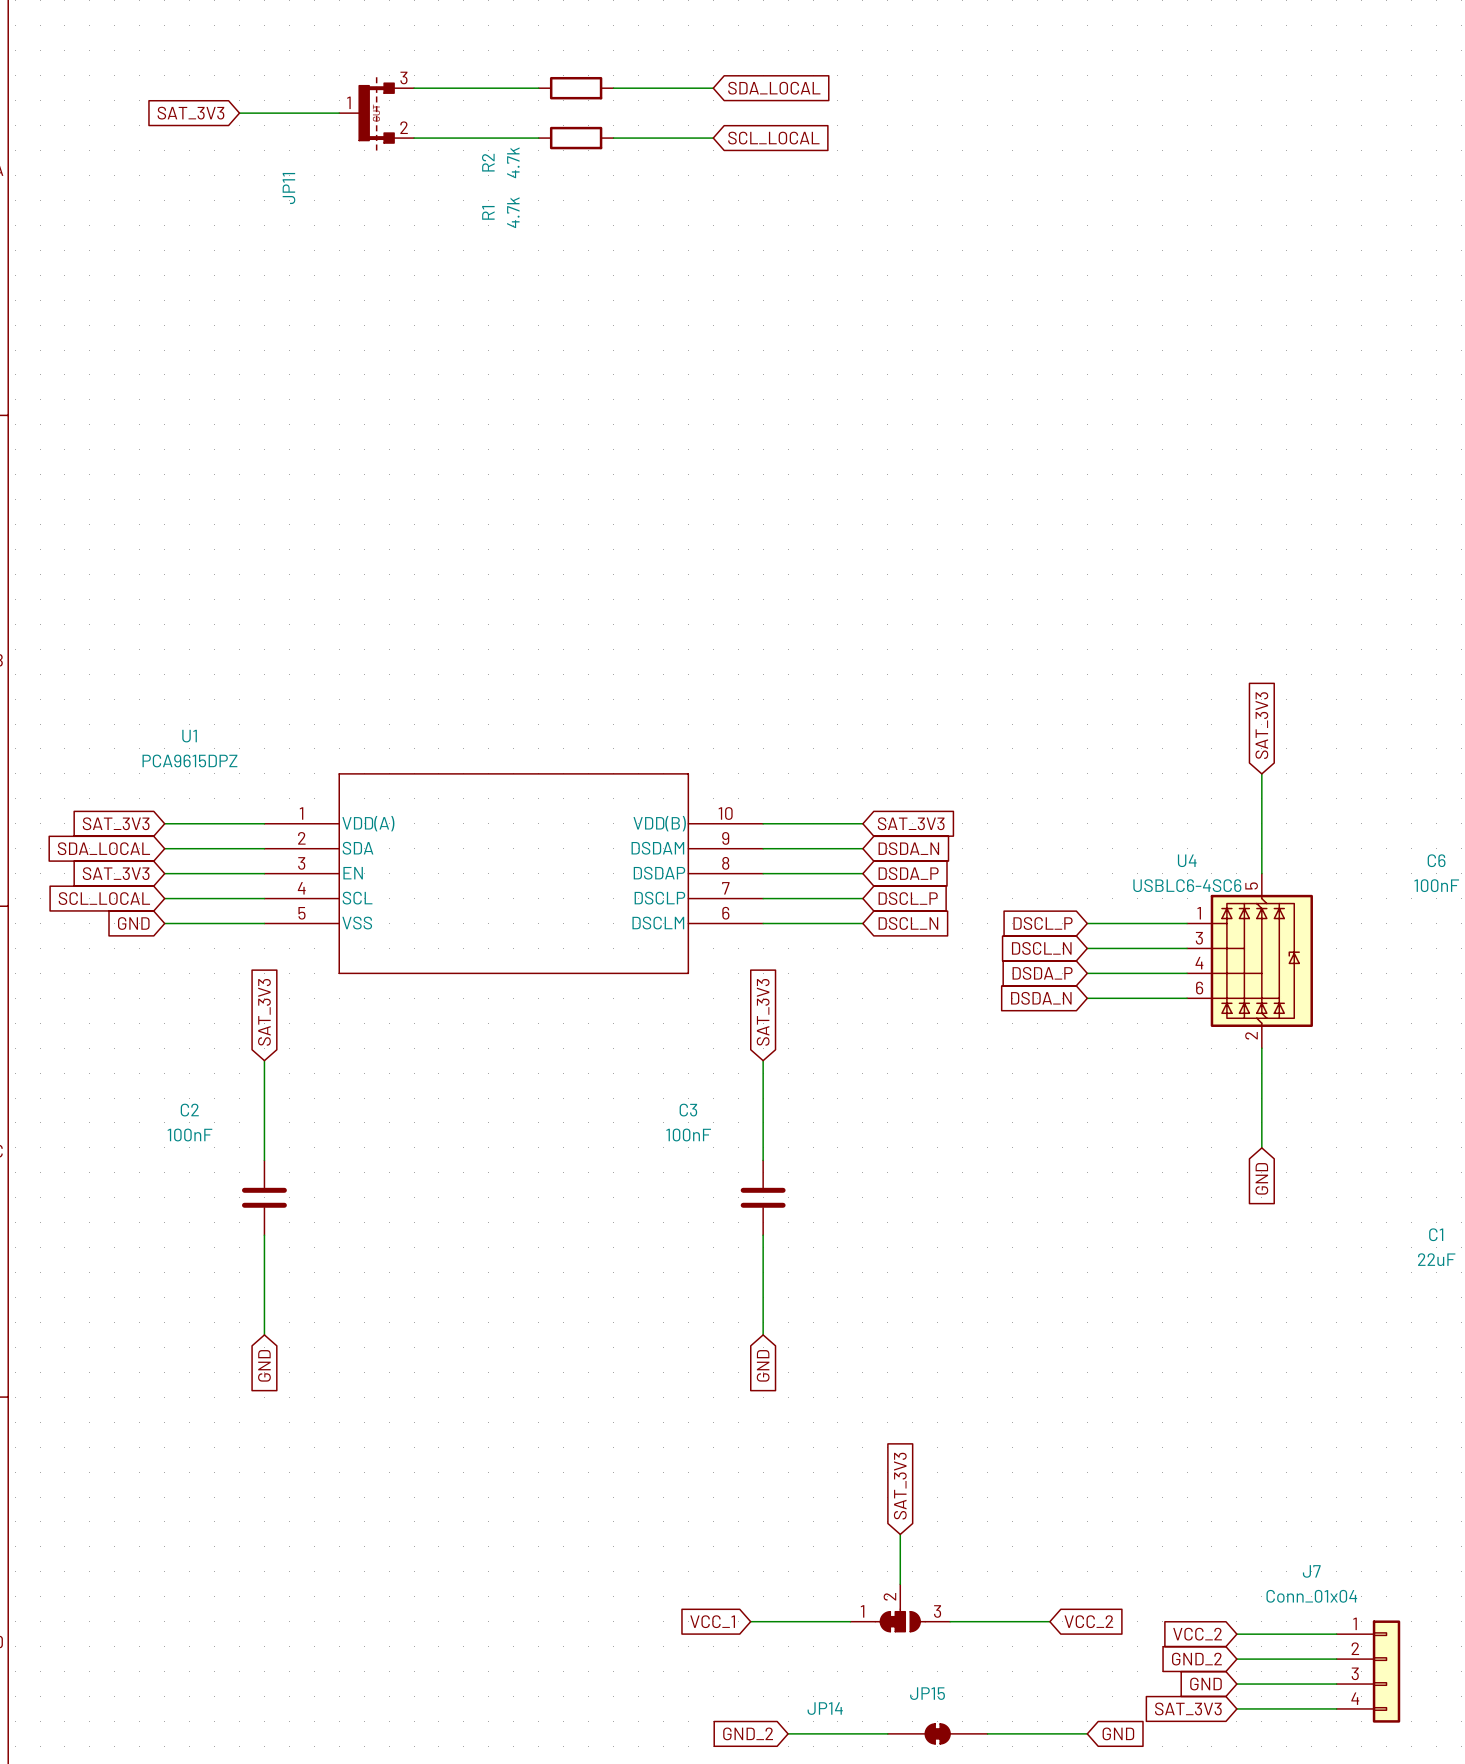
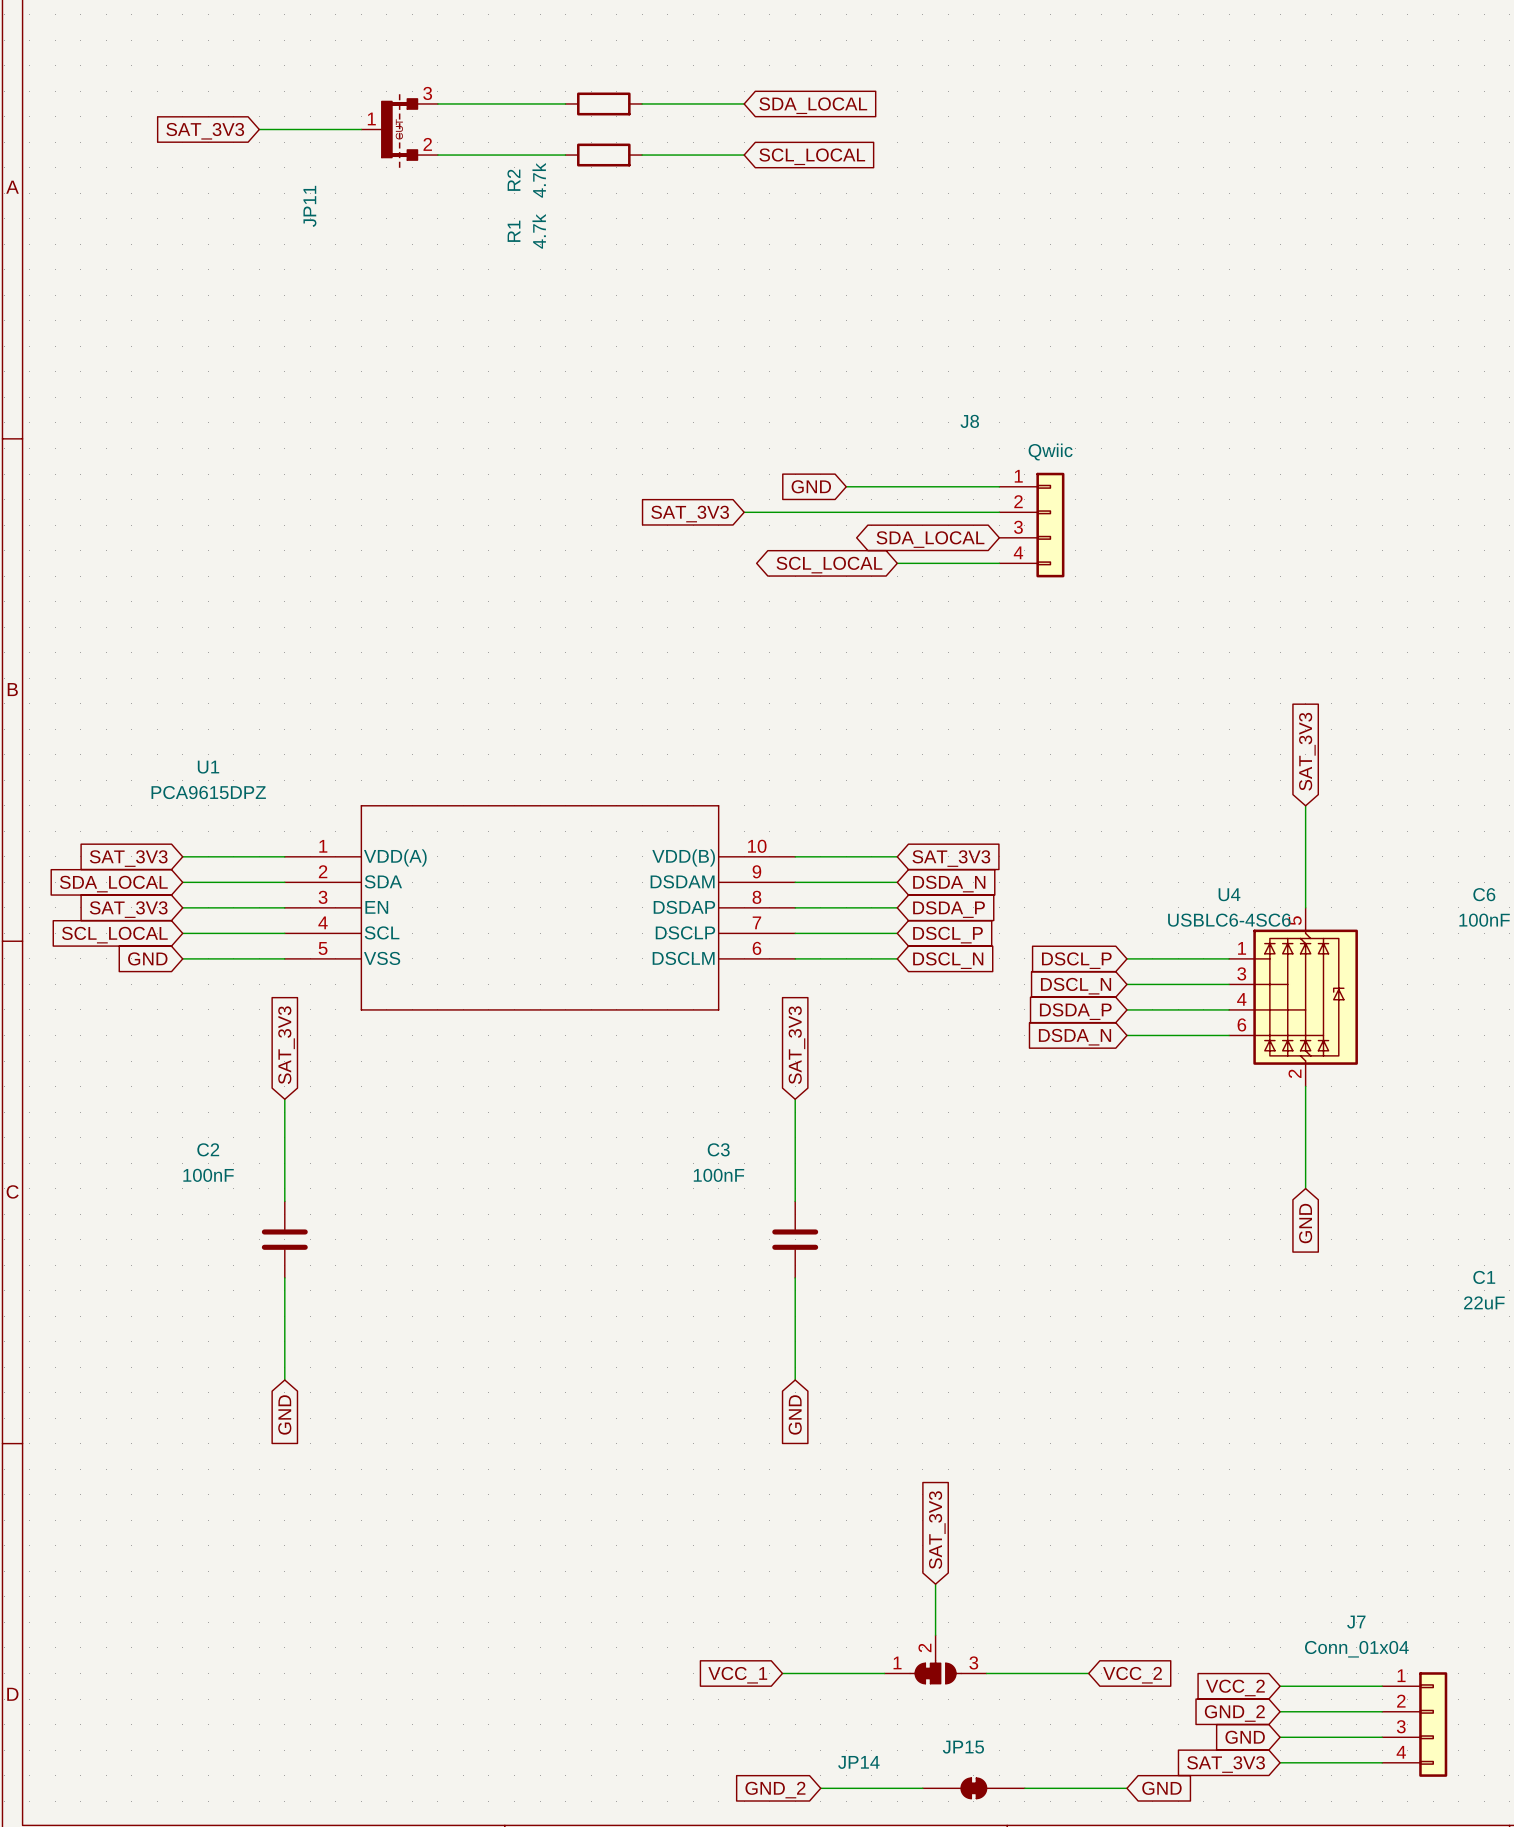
global label: none -> GND (811, 486)
wire: none -> (846, 486) (999, 486)
global label: none -> SAT_3V3 (690, 514)
wire: none -> (744, 512) (999, 512)
J8: none -> (1031, 525)
global label: none -> SDA_LOCAL (930, 539)
global label: none -> SCL_LOCAL (829, 565)
wire: none -> (897, 563) (999, 563)

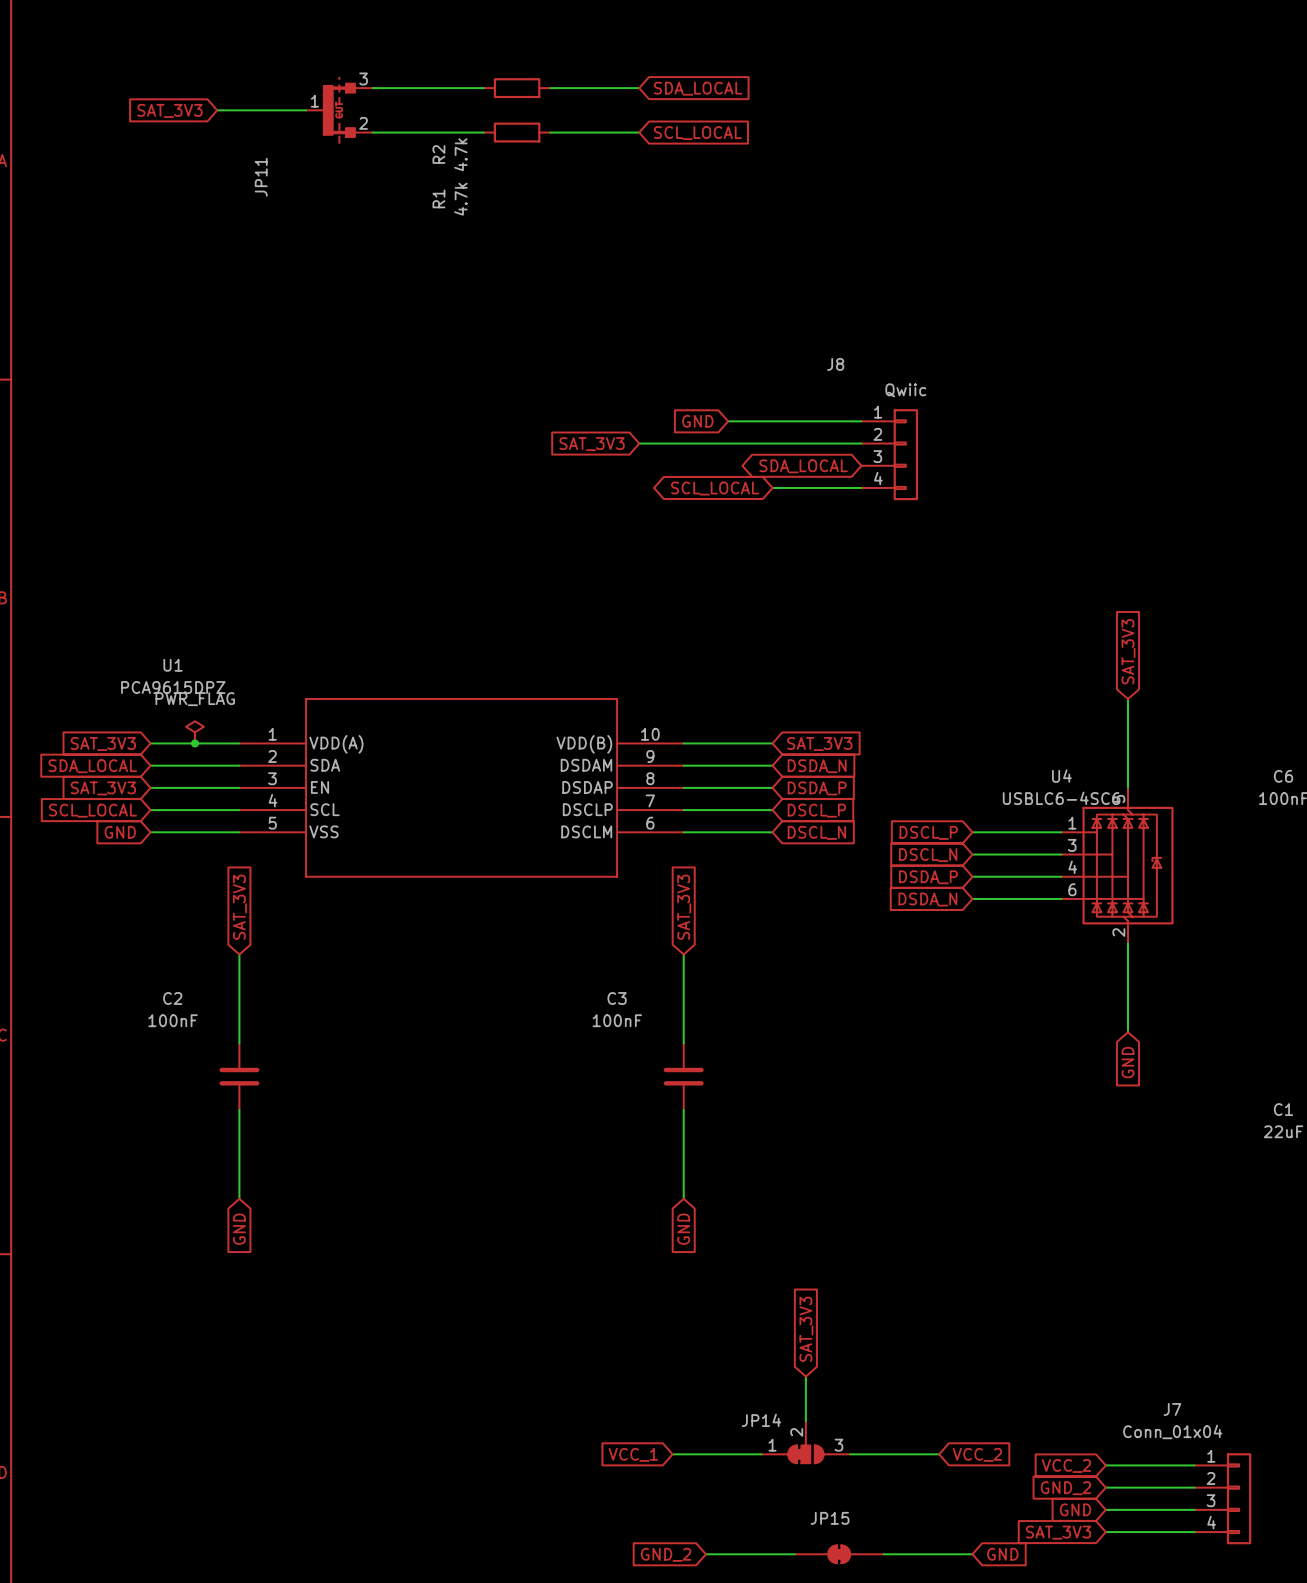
power symbol: none -> PWR_FLAG (194, 732)
junction: none -> (194, 743)
JP14 name position: JP14 (858, 1762) -> JP14 (761, 1420)

